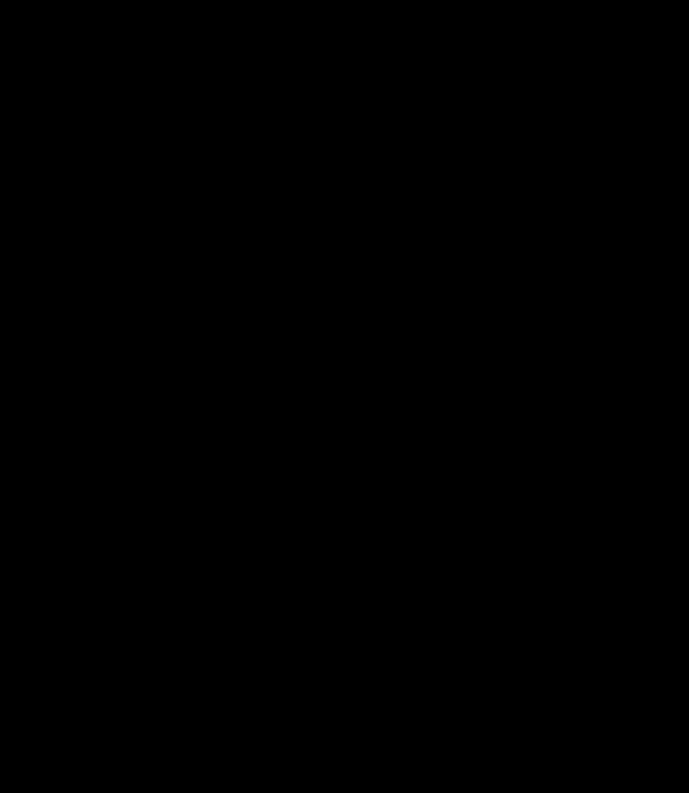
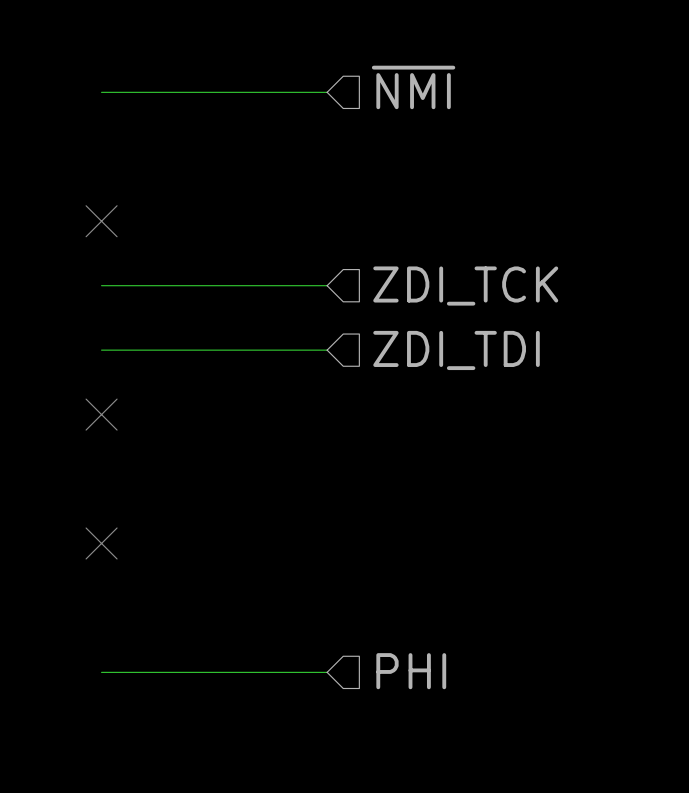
hierarchical label: none -> ~{NMI} (413, 87)
wire: none -> (101, 92) (327, 92)
no-connect mark: none -> (101, 221)
wire: none -> (101, 285) (327, 285)
hierarchical label: none -> ZDI_TCK (465, 286)
wire: none -> (101, 350) (327, 350)
hierarchical label: none -> ZDI_TDI (456, 350)
no-connect mark: none -> (101, 414)
no-connect mark: none -> (101, 543)
hierarchical label: none -> PHI (411, 671)
wire: none -> (101, 672) (327, 672)

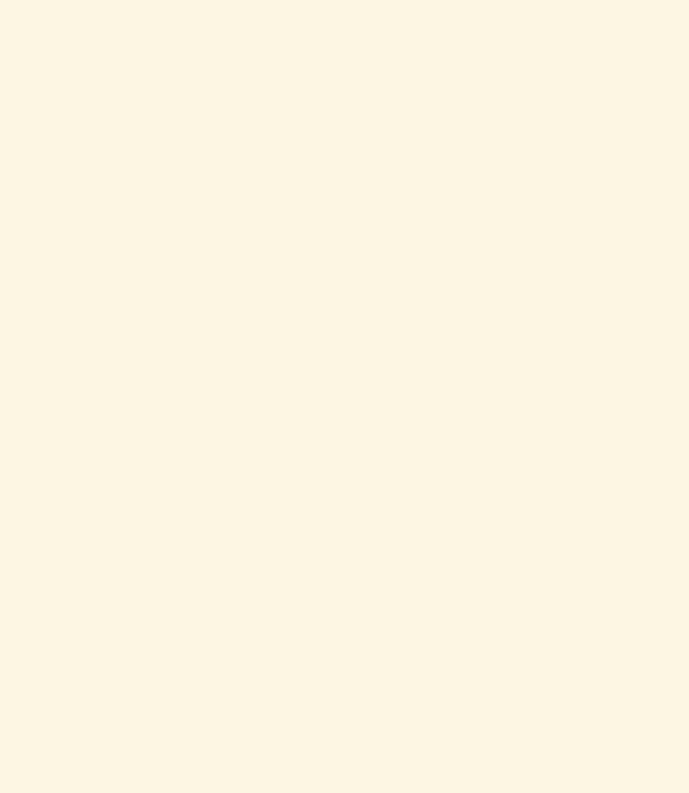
hierarchical label: ~{NMI} (413, 87) -> none
wire: (101, 92) (327, 92) -> none
no-connect mark: (101, 221) -> none
wire: (101, 285) (327, 285) -> none
hierarchical label: ZDI_TCK (465, 286) -> none
wire: (101, 350) (327, 350) -> none
hierarchical label: ZDI_TDI (456, 350) -> none
no-connect mark: (101, 414) -> none
no-connect mark: (101, 543) -> none
hierarchical label: PHI (411, 671) -> none
wire: (101, 672) (327, 672) -> none

